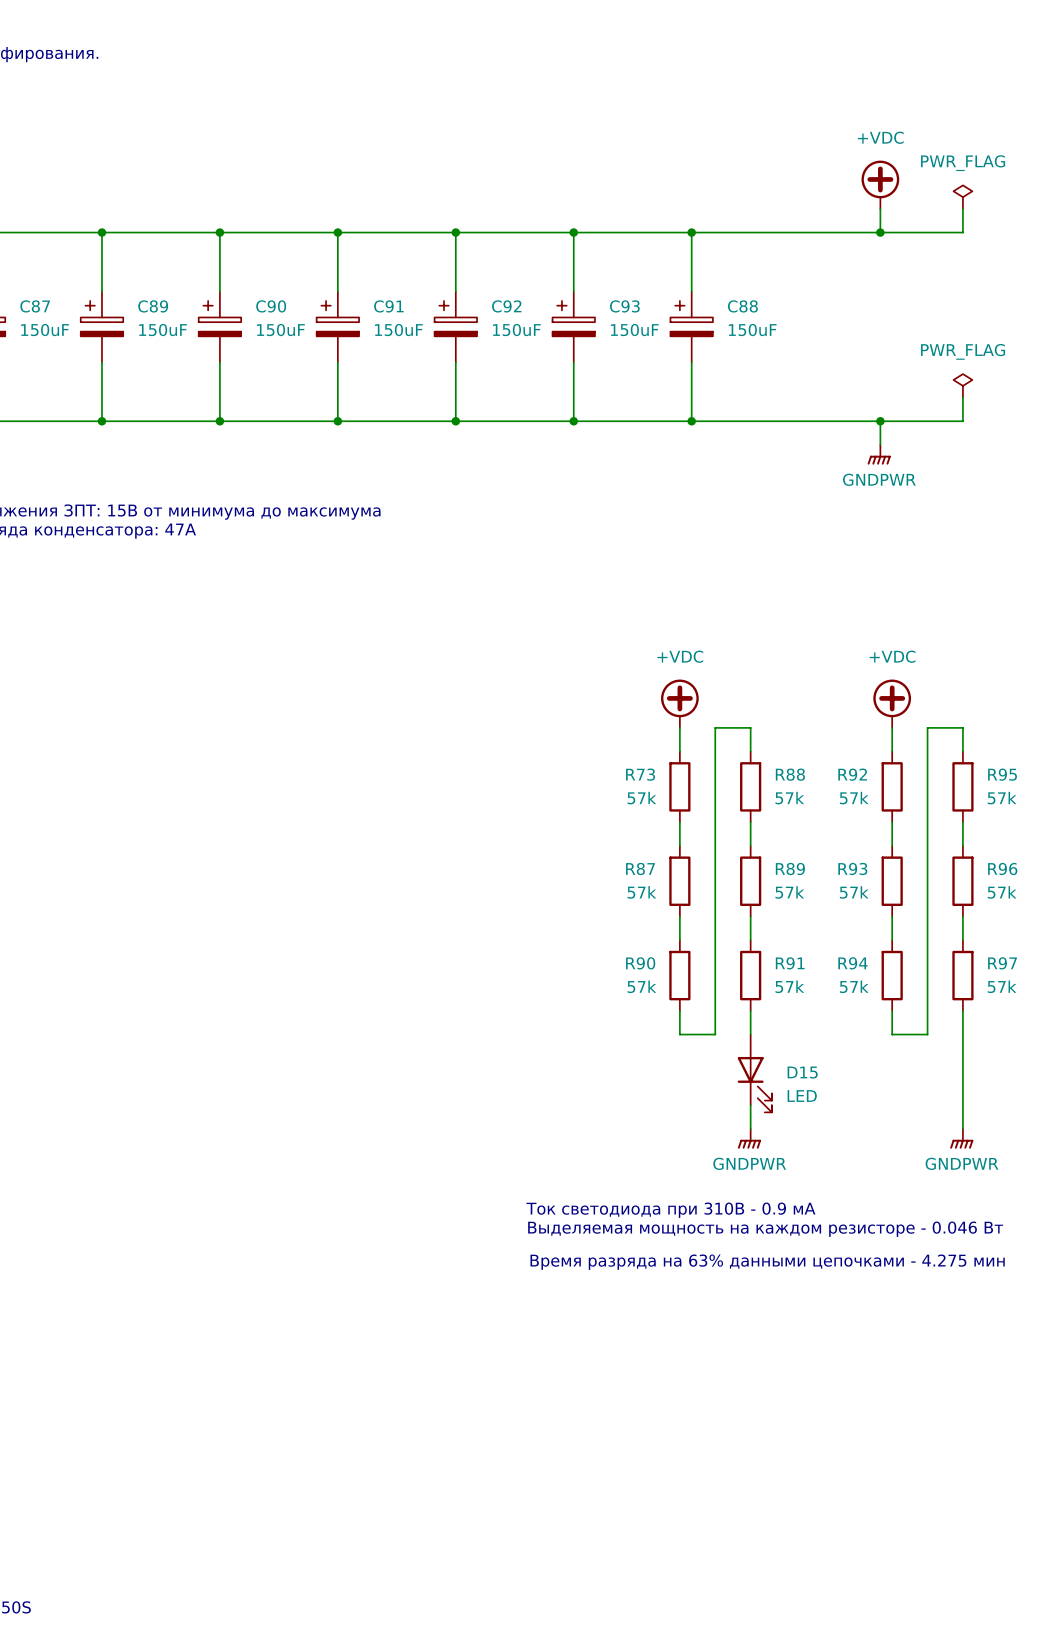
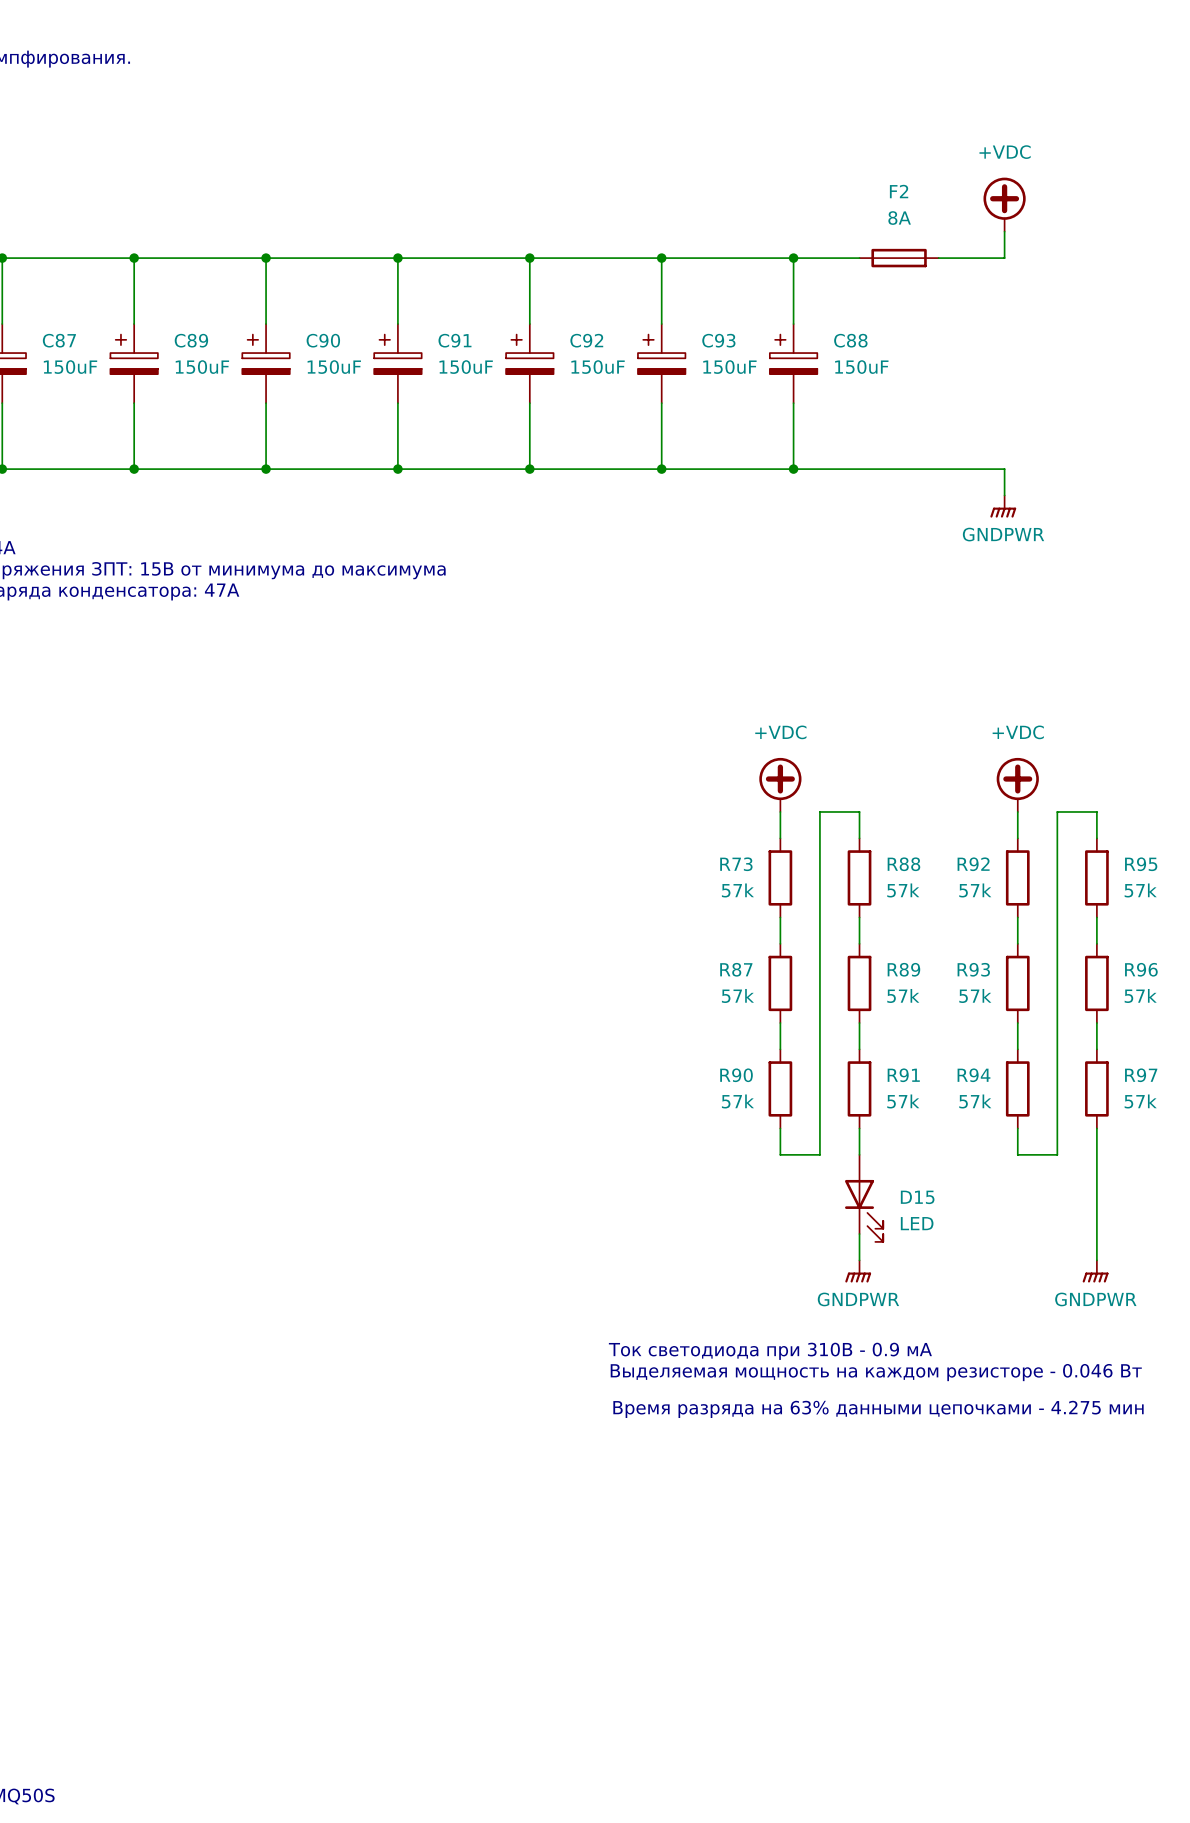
power symbol: PWR_FLAG (962, 197) -> none
wire: (962, 208) (962, 232) (880, 232) -> none
F2: none -> 8A (899, 258)
junction: (880, 232) -> none
power symbol: PWR_FLAG (962, 385) -> none
wire: (962, 397) (962, 421) (880, 421) -> none
junction: (880, 421) -> none

